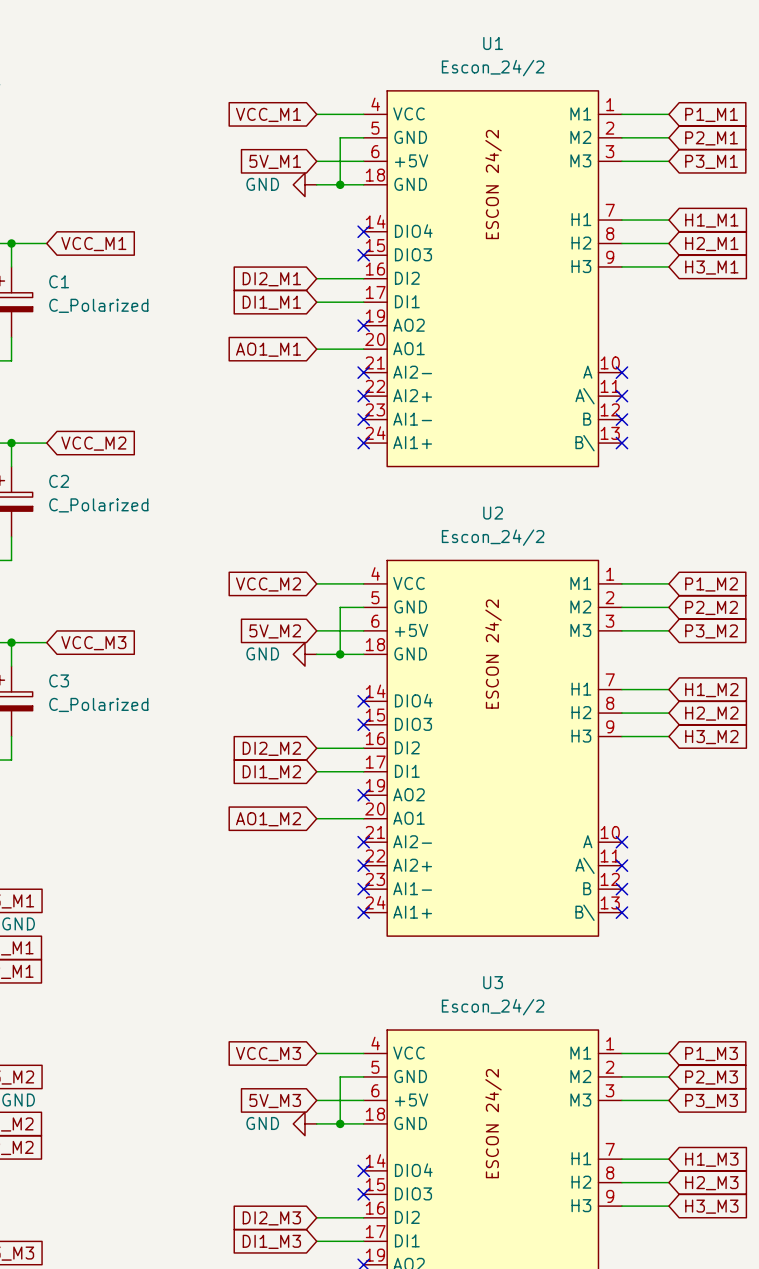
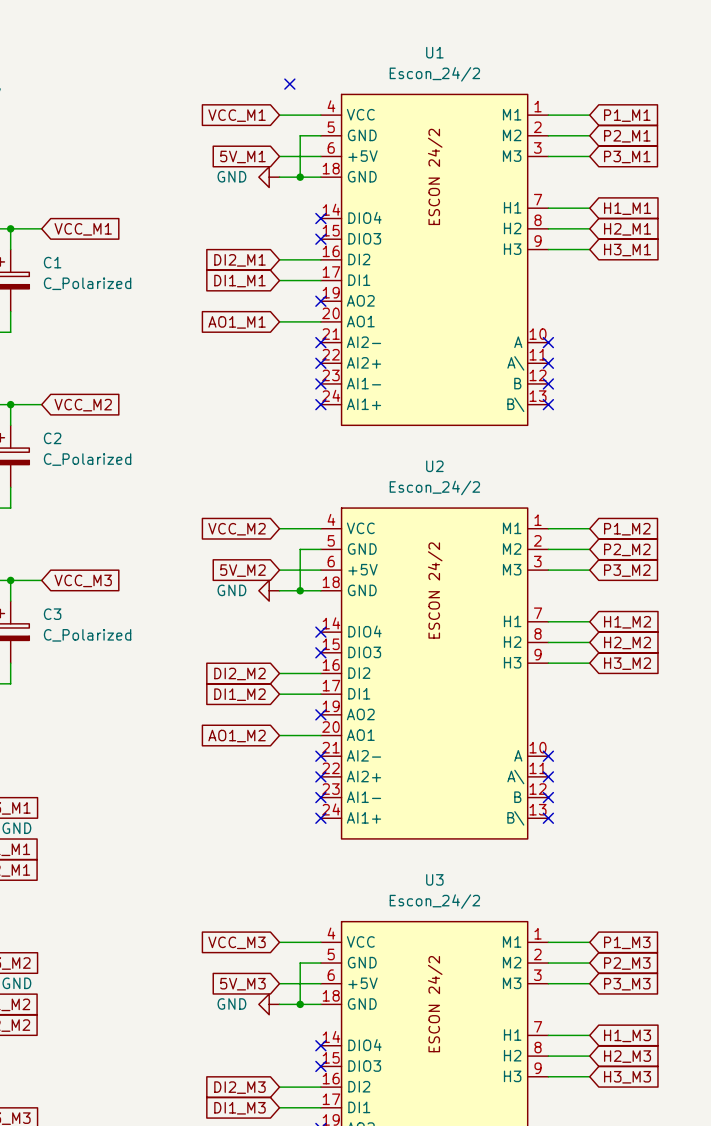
no-connect mark: none -> (289, 84)

